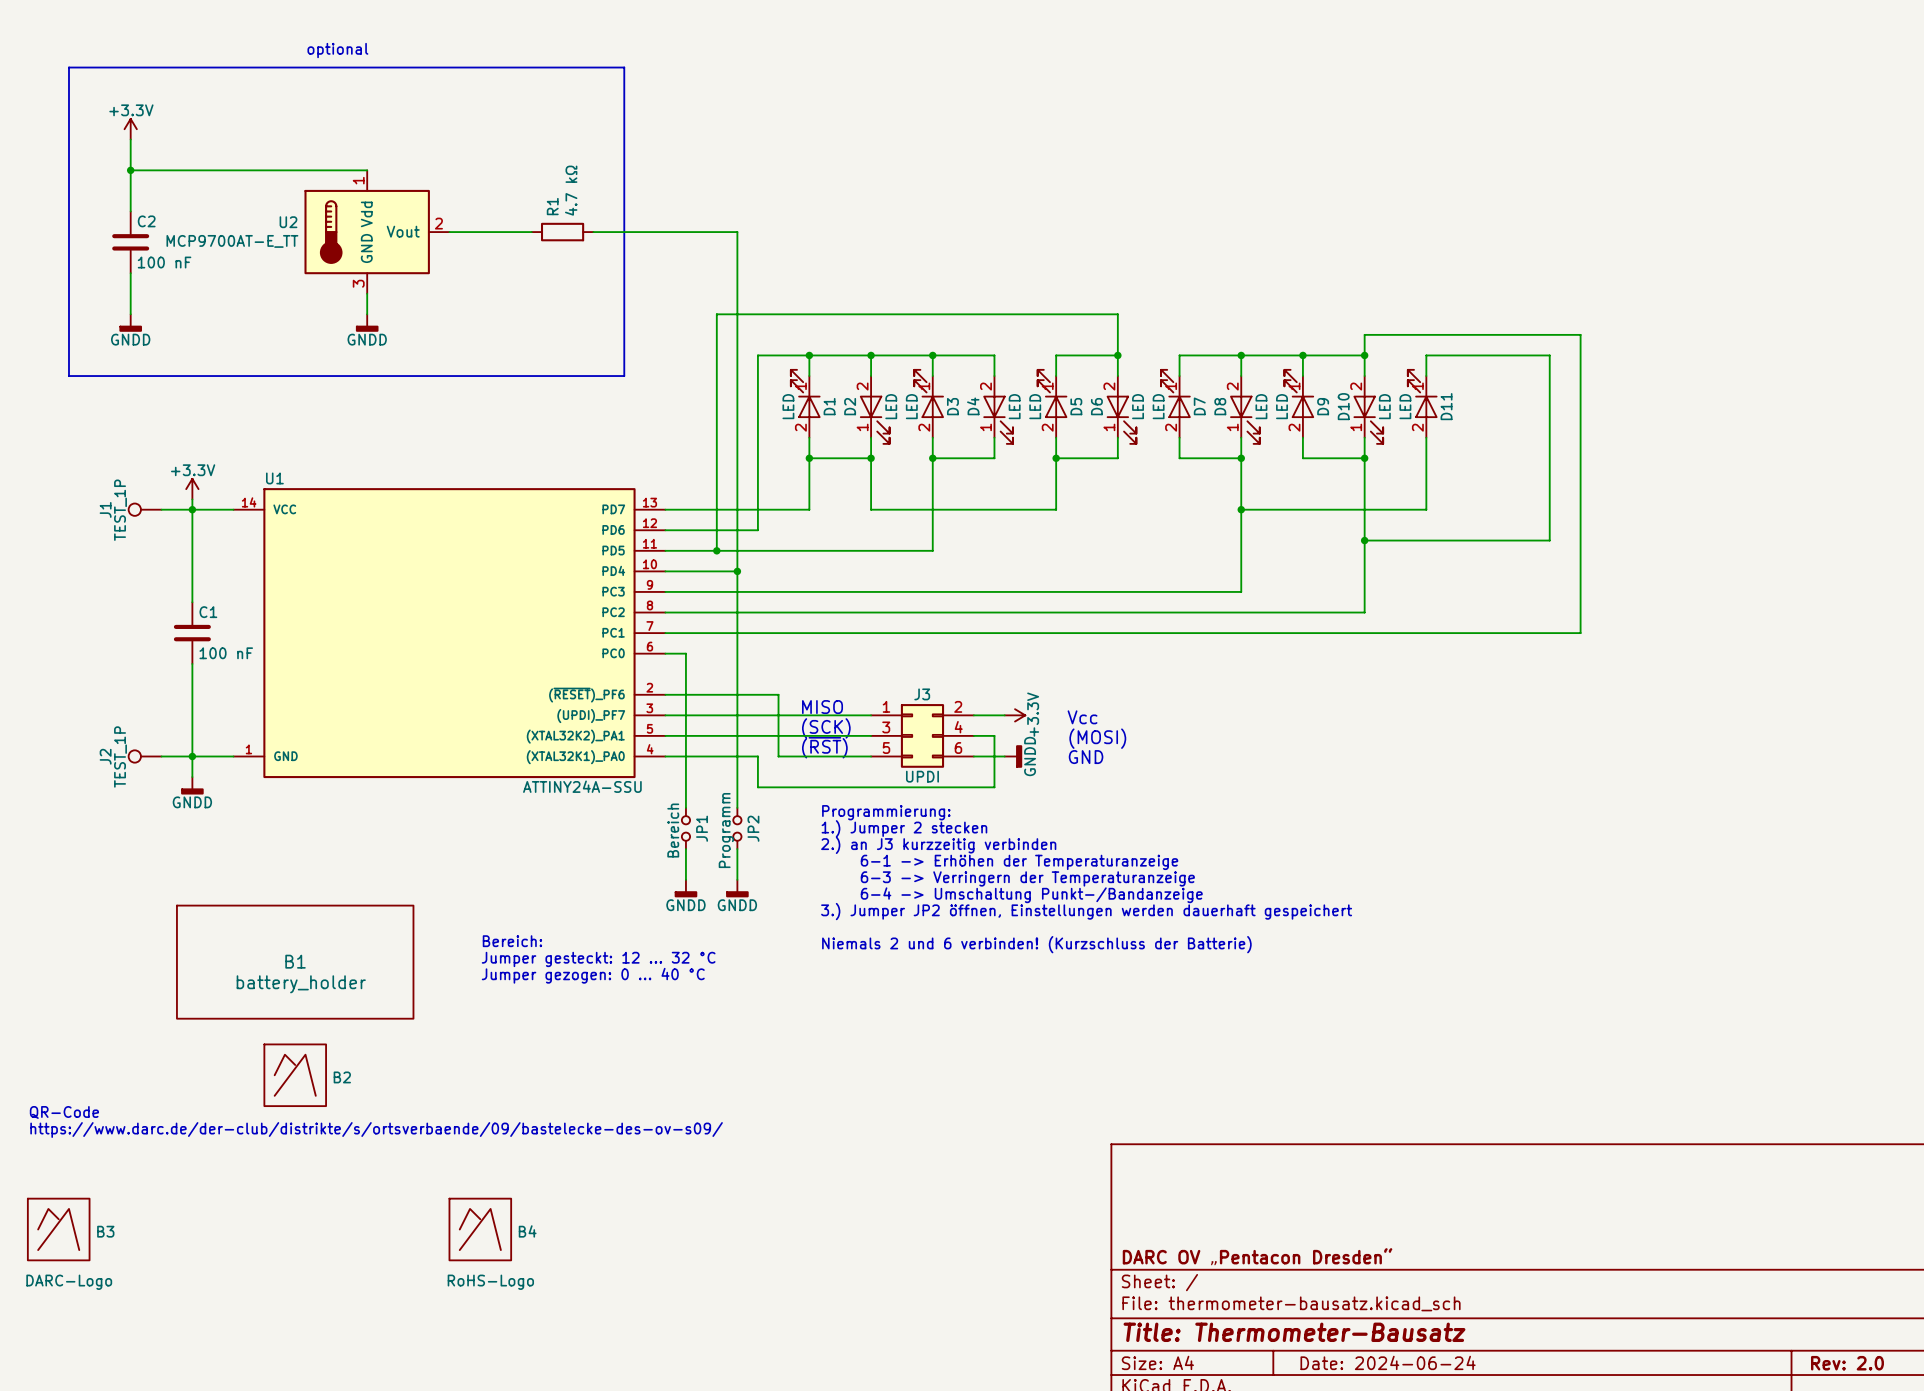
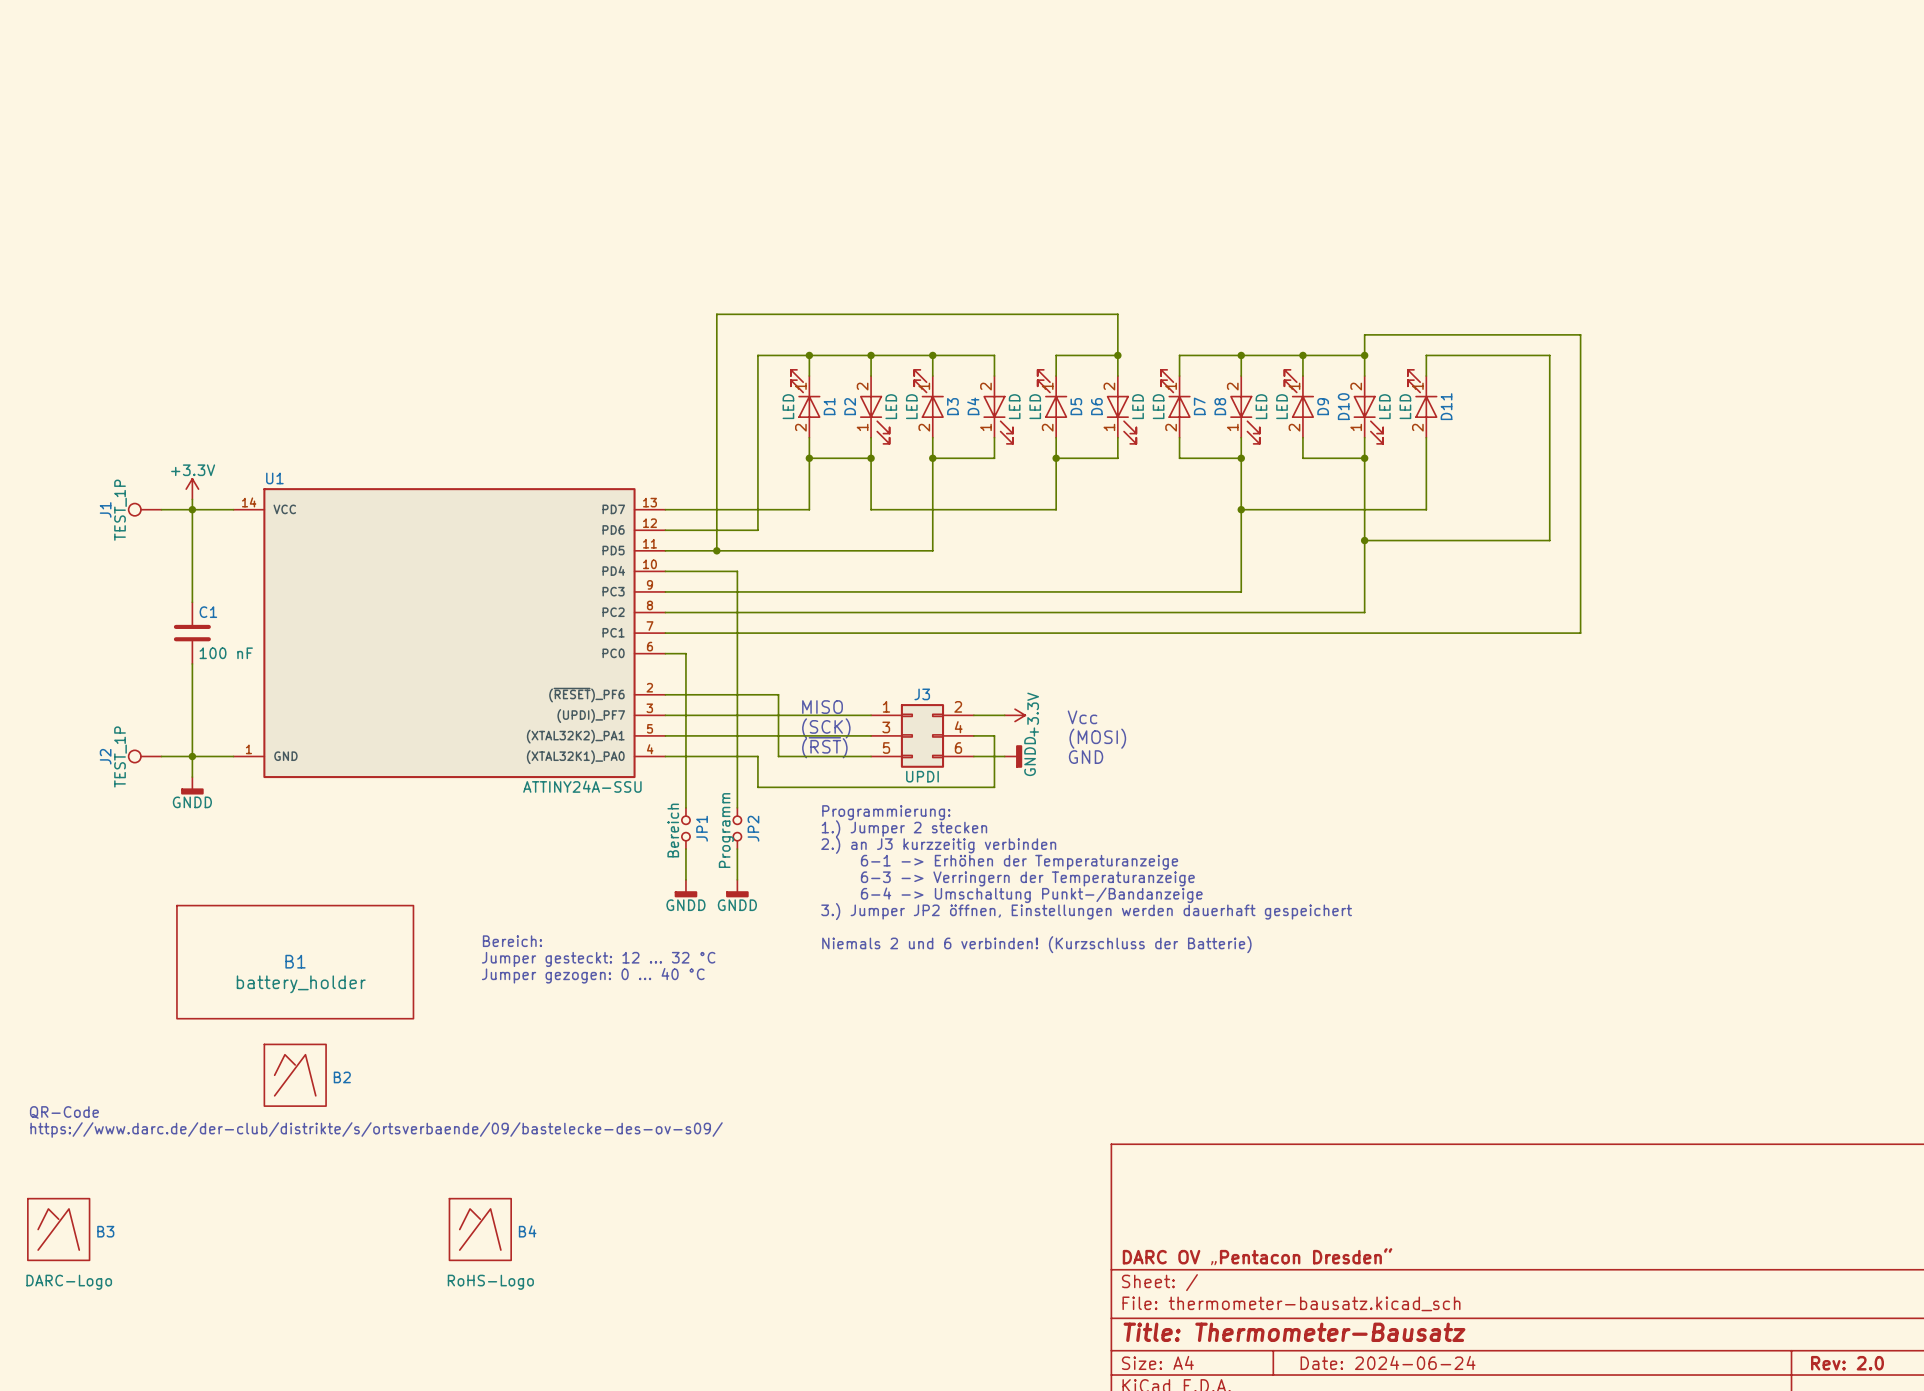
text: optional (337, 50) -> none
line: (68, 67) (68, 376) (624, 376) (624, 67) (68, 67) -> none
power symbol: +3.3V (130, 129) -> none
wire: (130, 139) (130, 211) -> none
wire: (130, 170) (367, 170) -> none
junction: (130, 170) -> none
U2: MCP9700AT-E_TT (376, 232) -> none
wire: (449, 232) (531, 232) -> none
R1: 4.7 kΩ (562, 232) -> none
wire: (593, 232) (737, 232) (737, 571) -> none
C2: 100 nF (130, 242) -> none
wire: (130, 273) (130, 314) -> none
wire: (367, 293) (367, 314) -> none
power symbol: GNDD (130, 323) -> none
power symbol: GNDD (367, 323) -> none
junction: (737, 571) -> none

